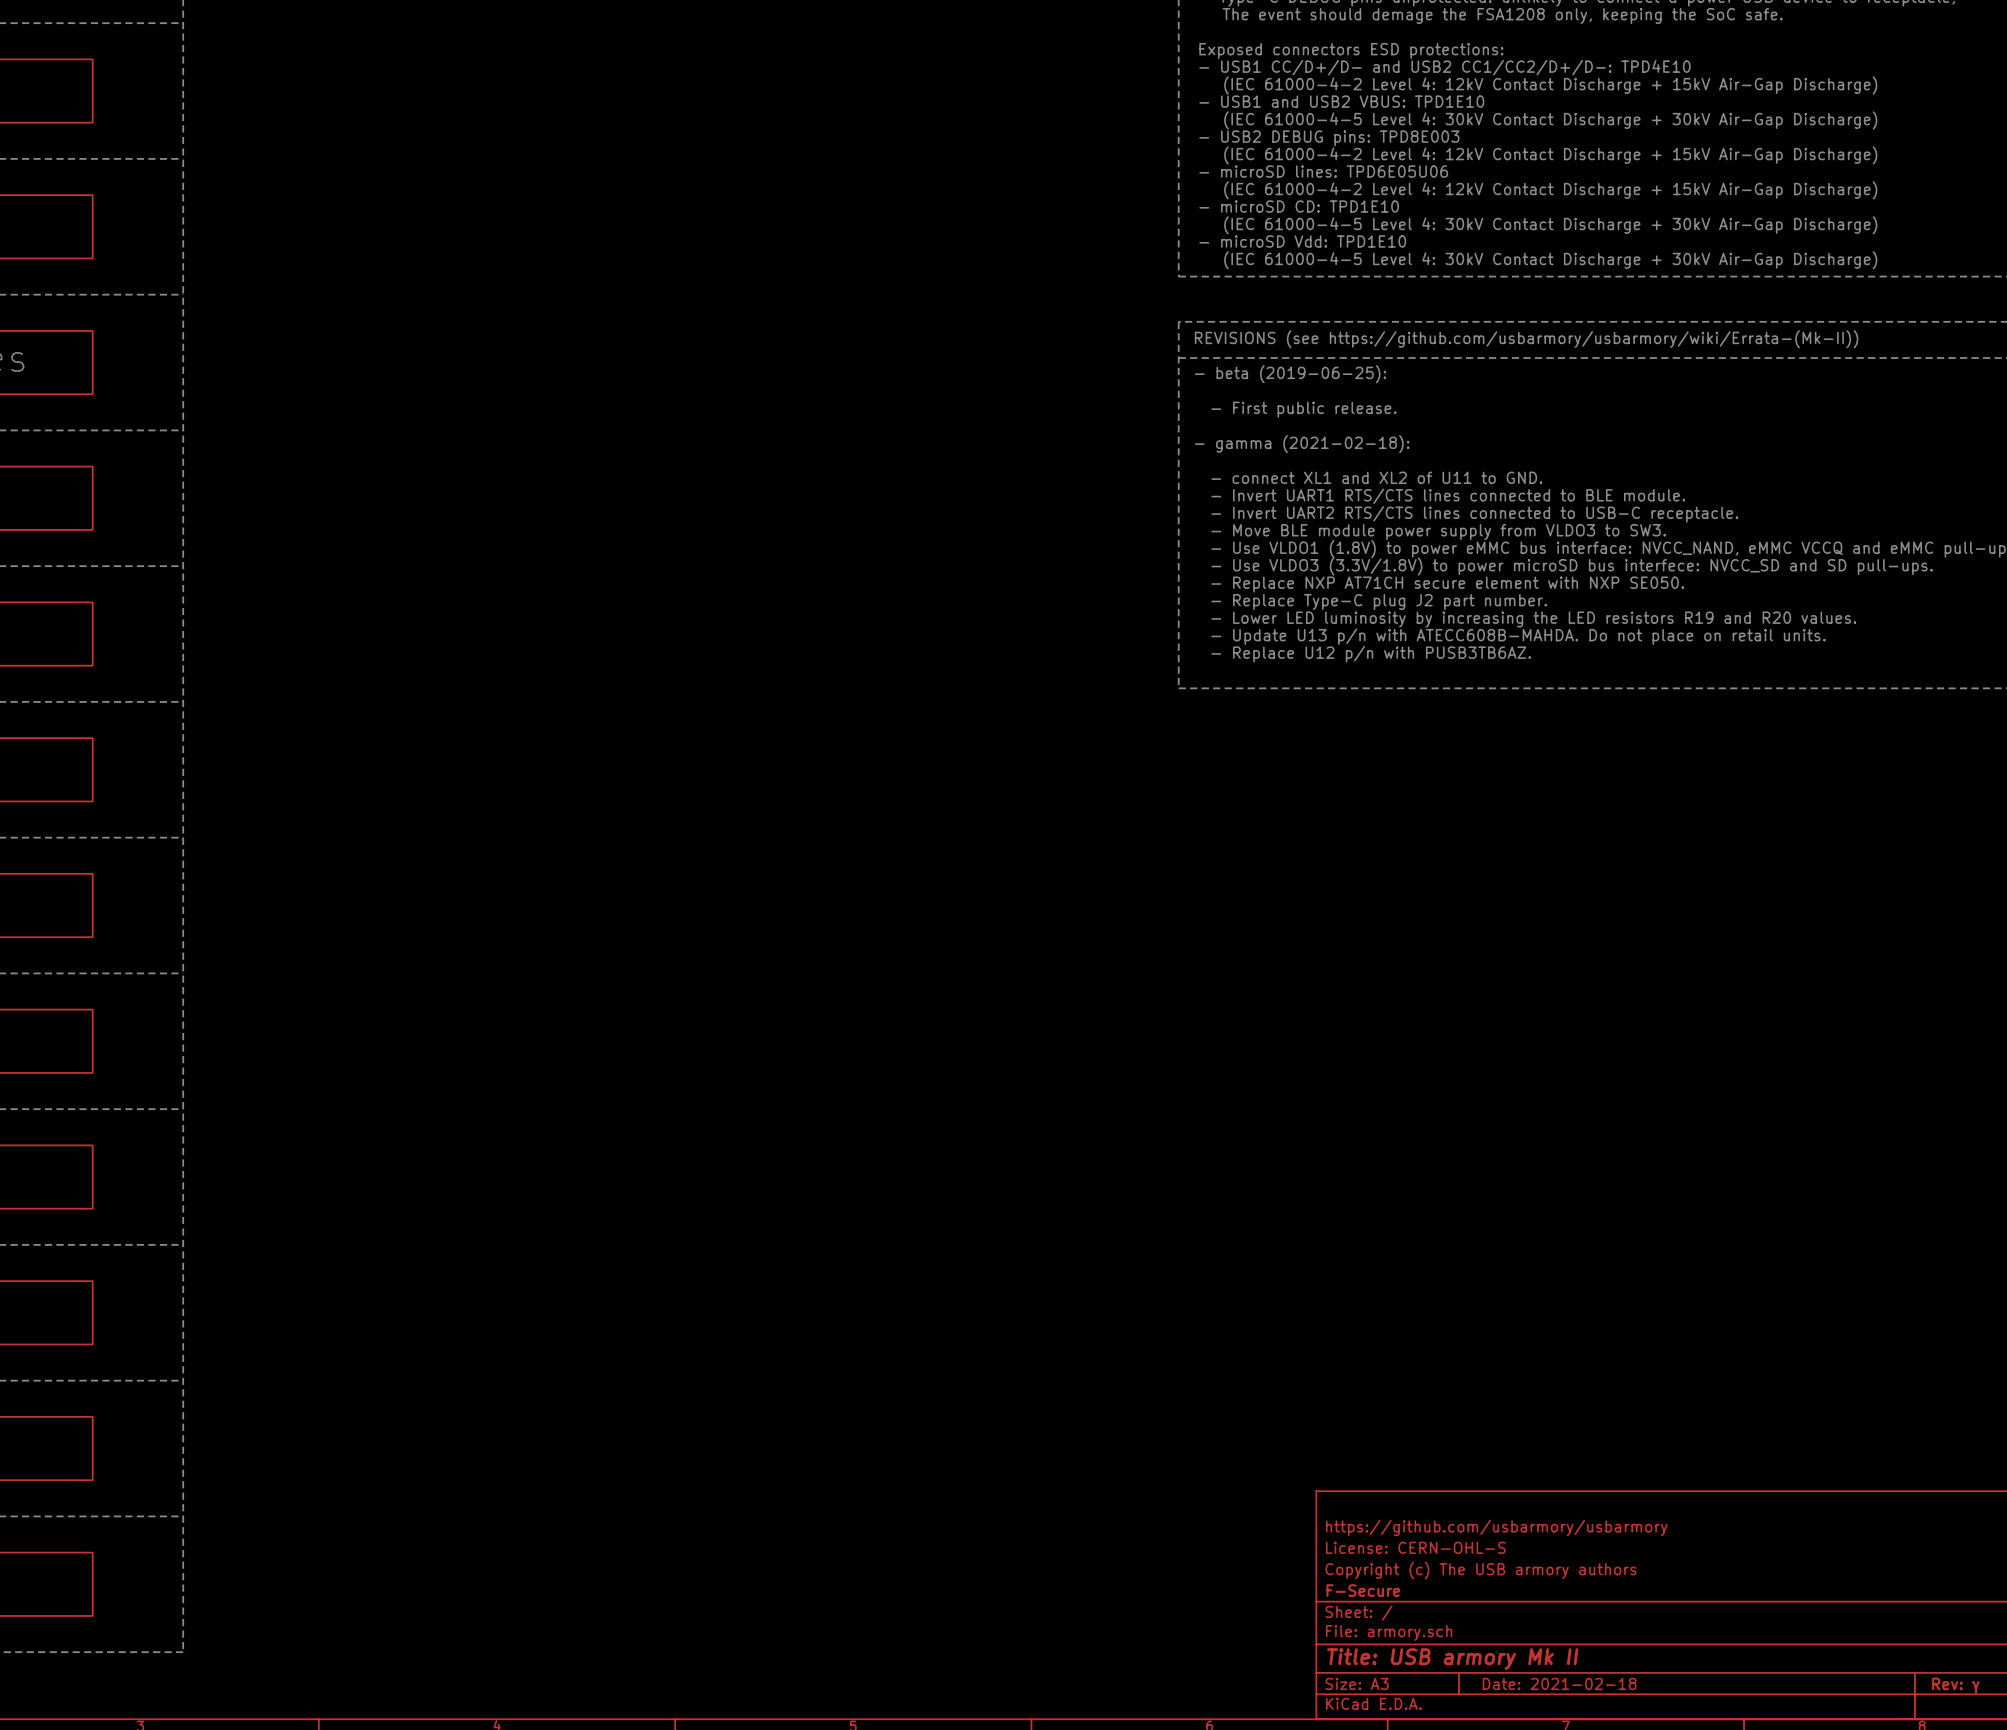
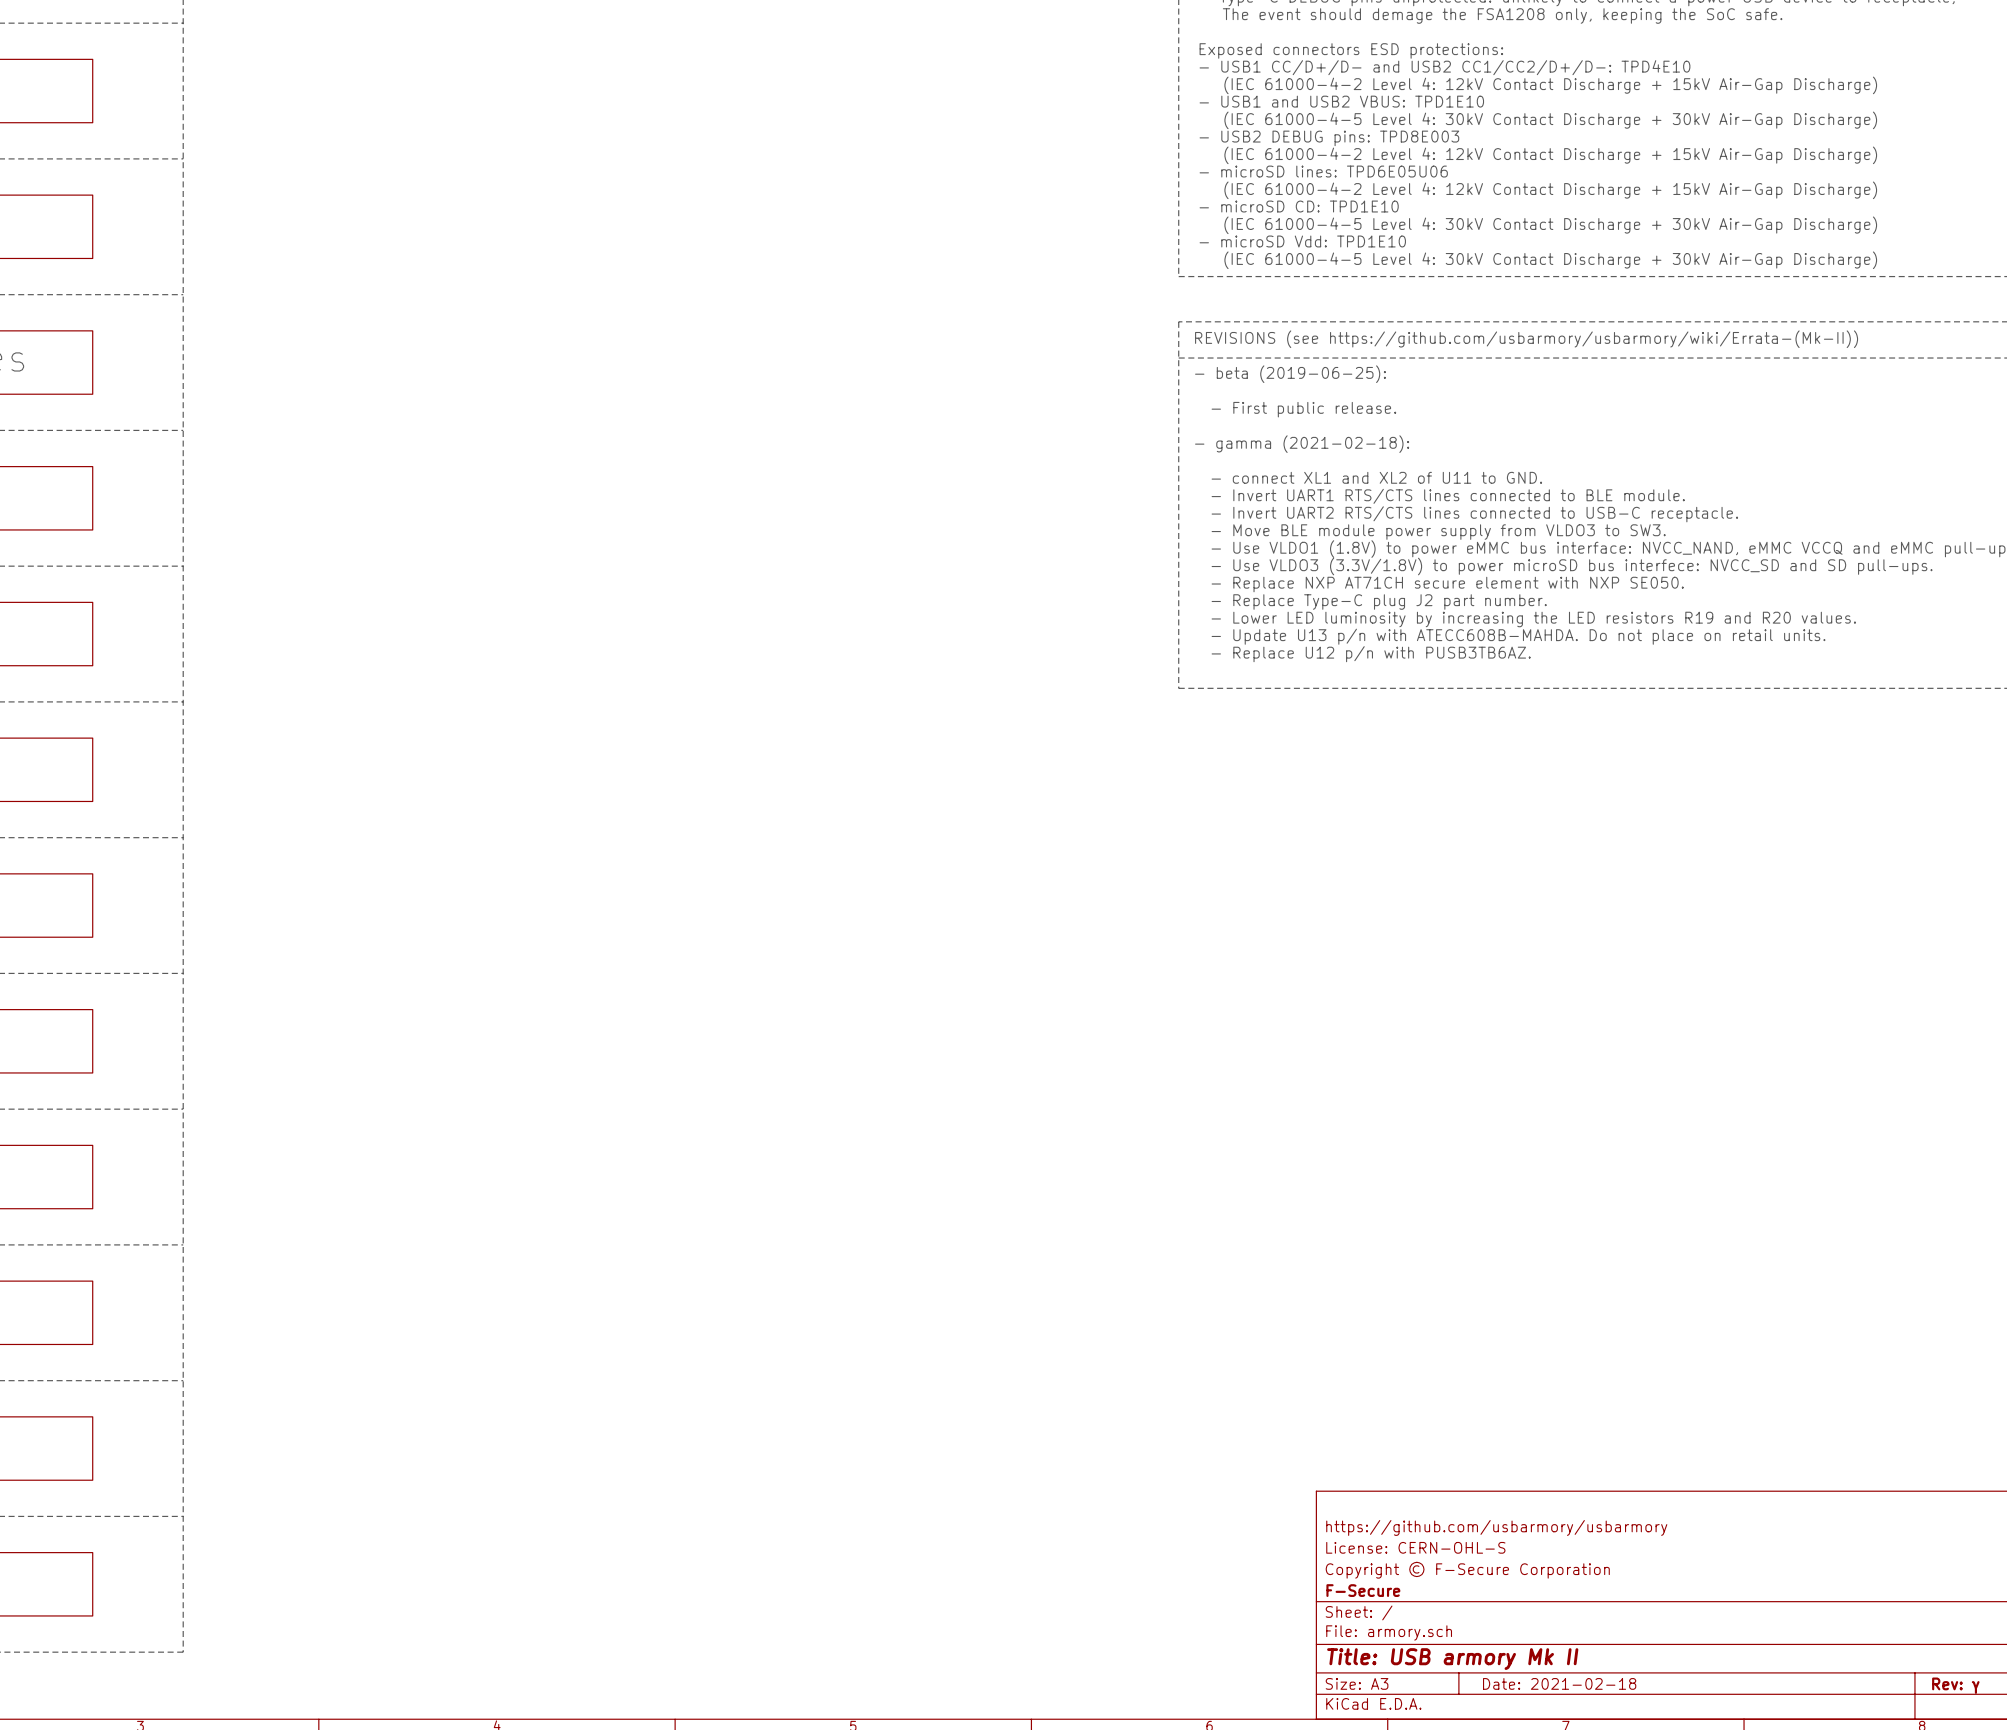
title block: Copyright (c) The USB armory authors (1481, 1570) -> Copyright © F-Secure Corporation (1467, 1570)

